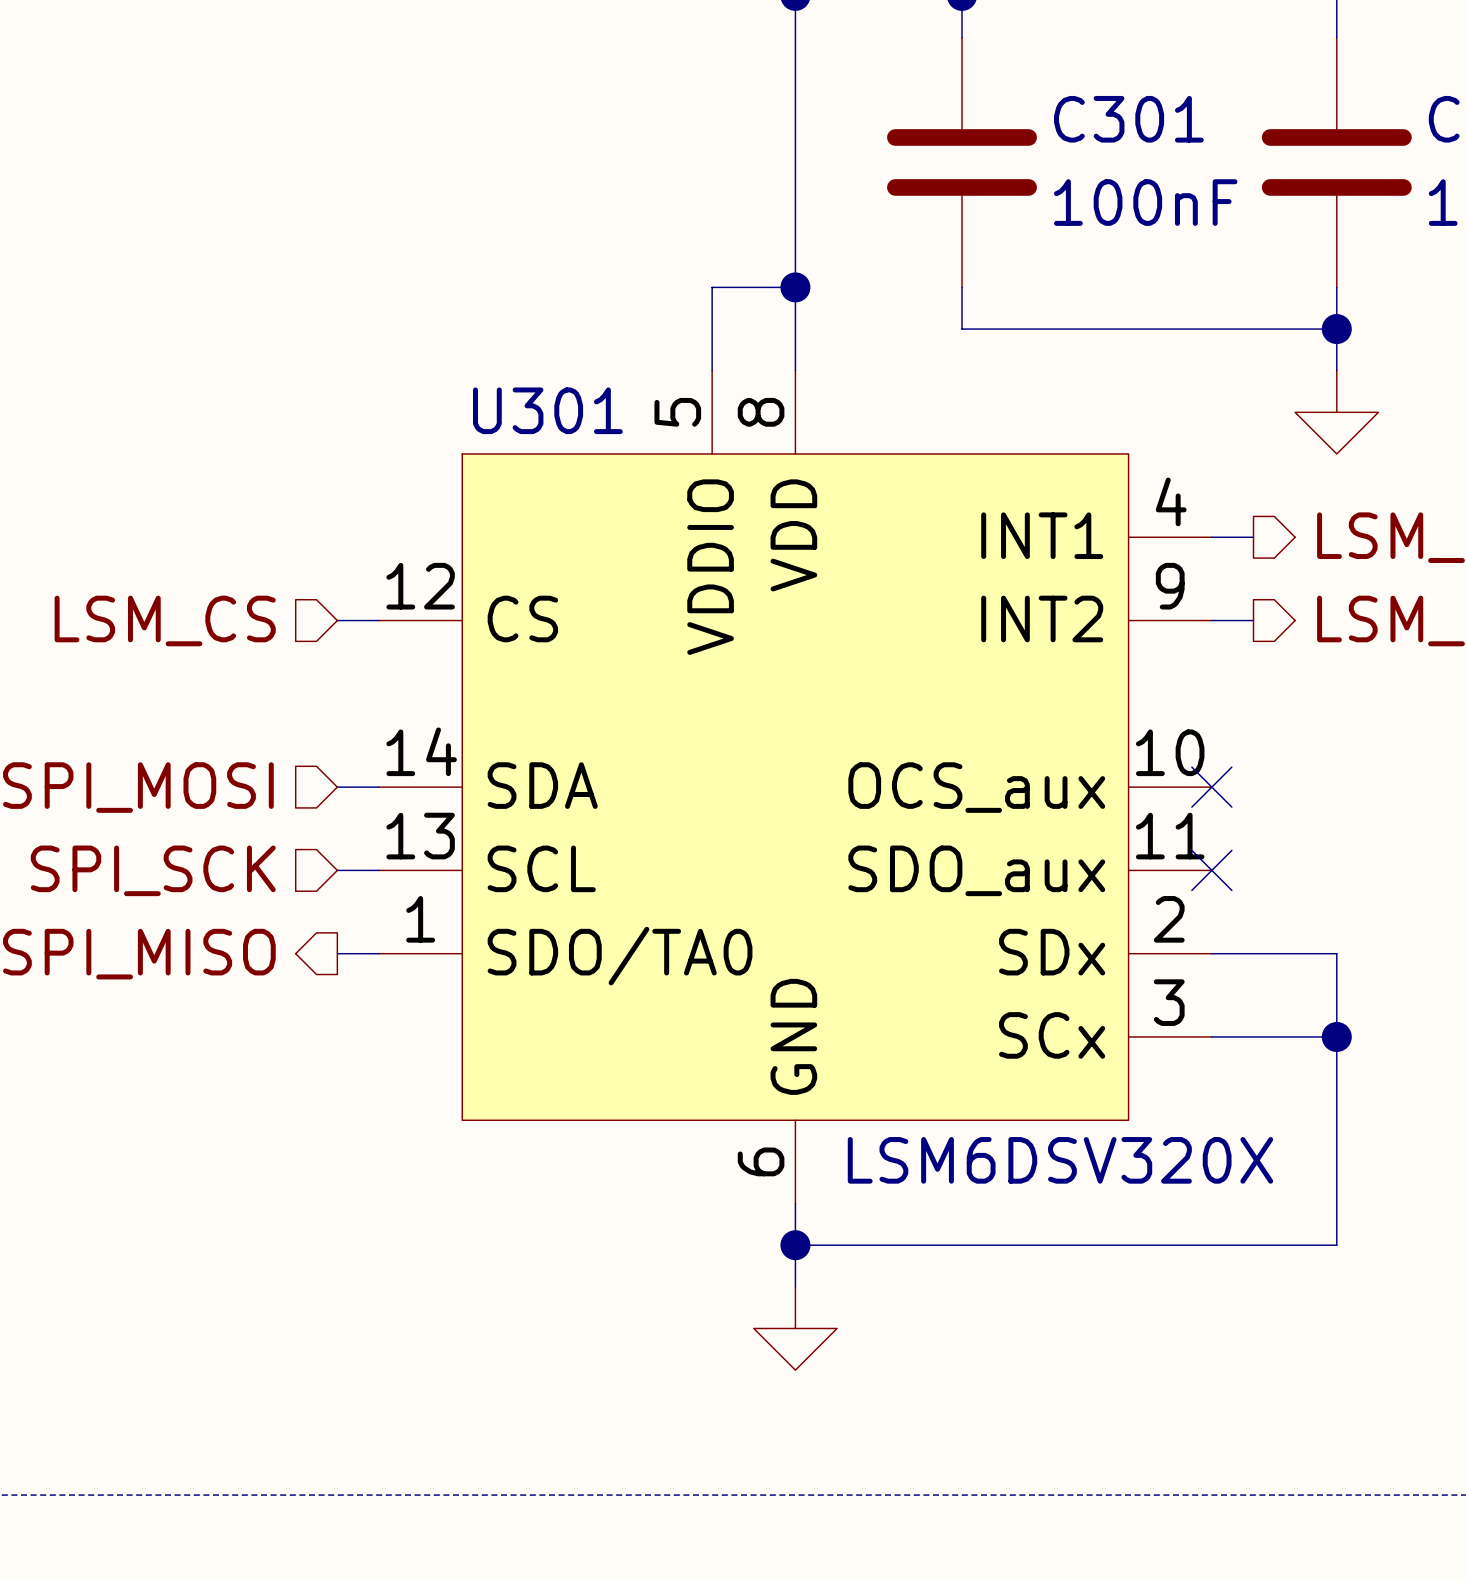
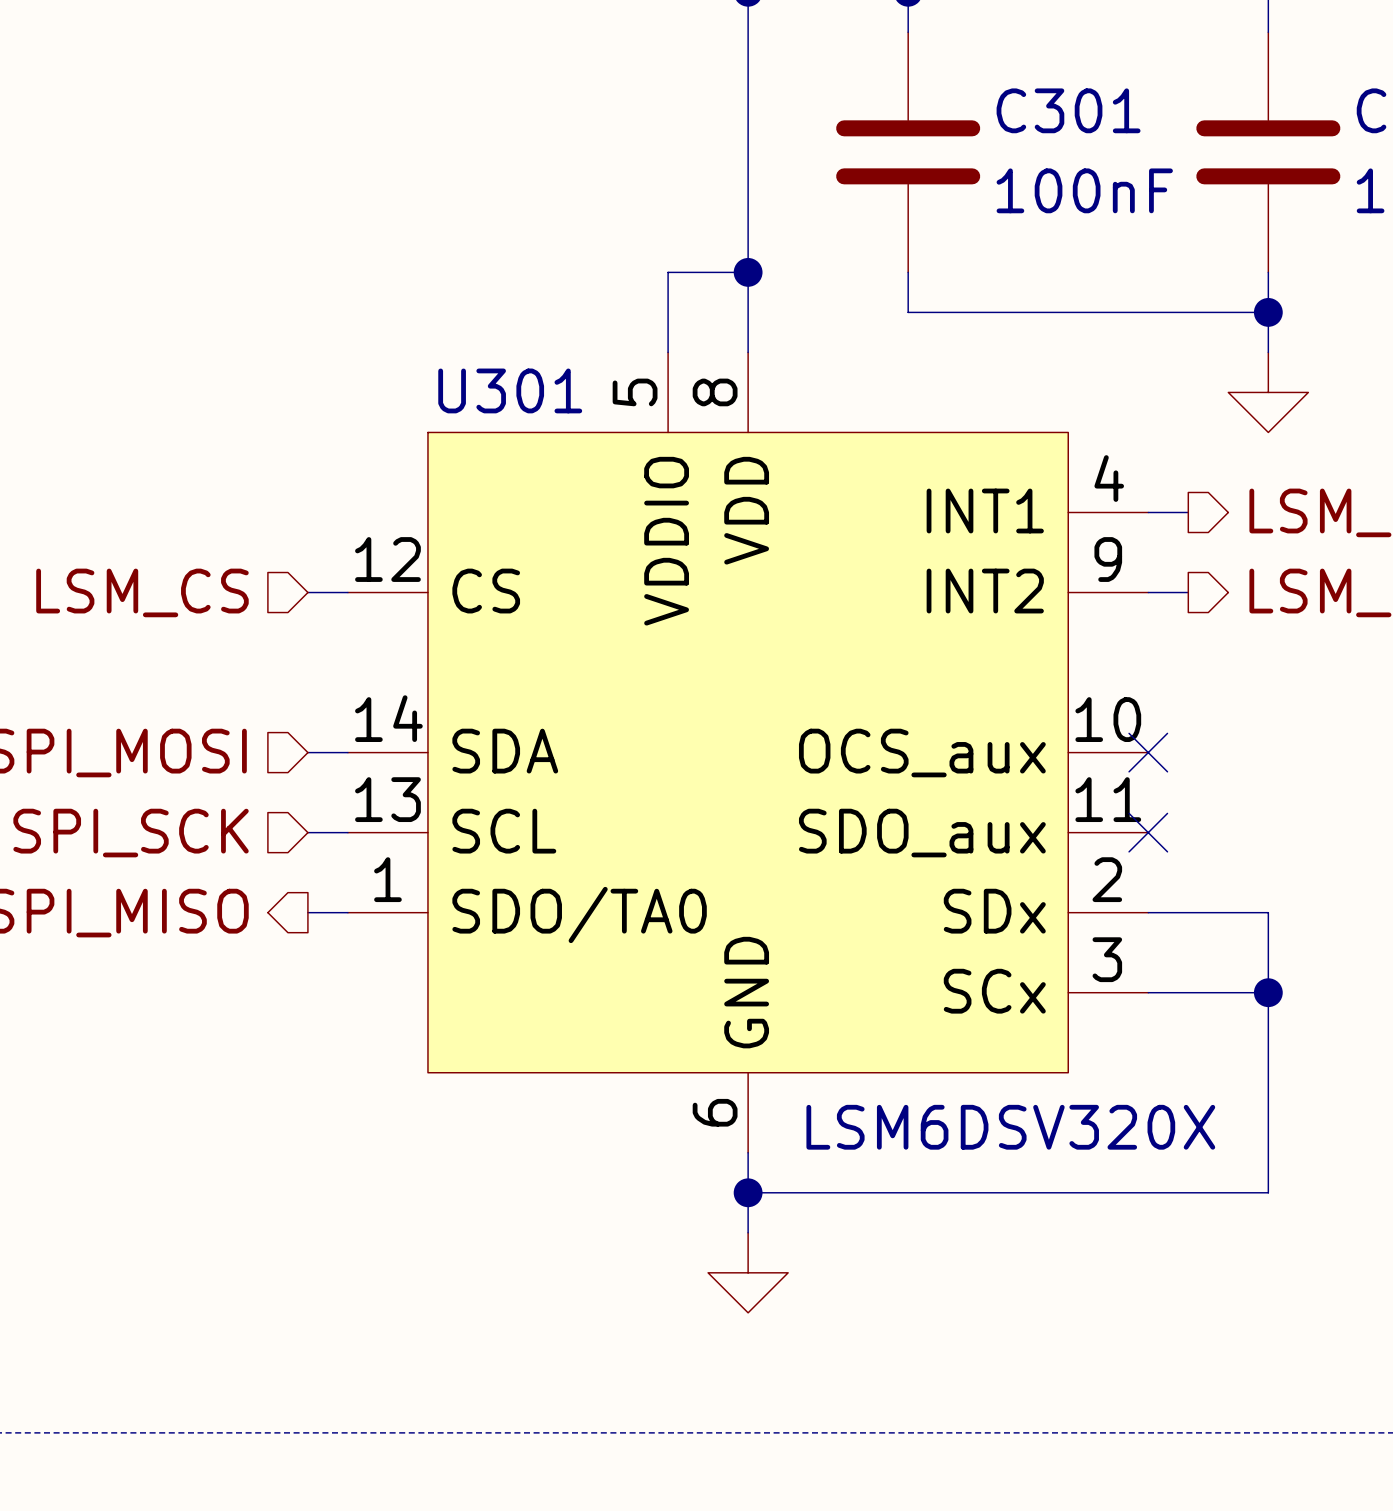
U301 value position: LSM6DSV320X (1060, 1160) -> LSM6DSV320X (1010, 1127)

